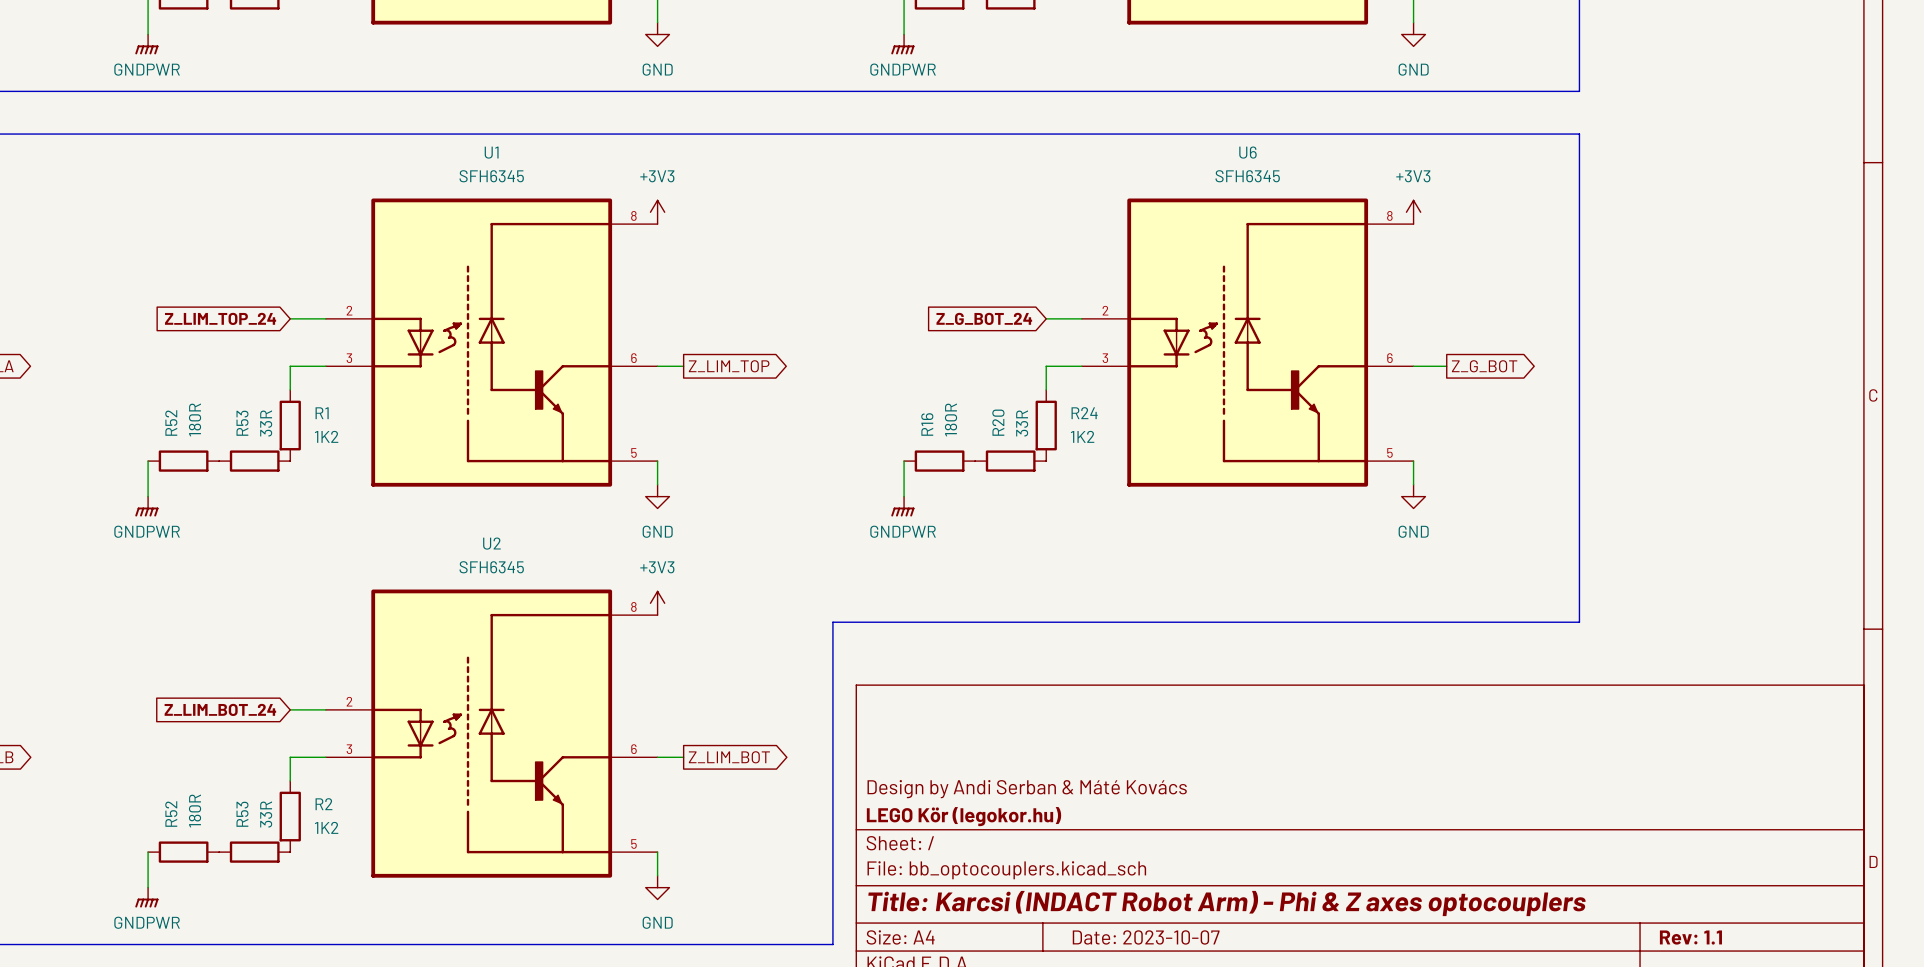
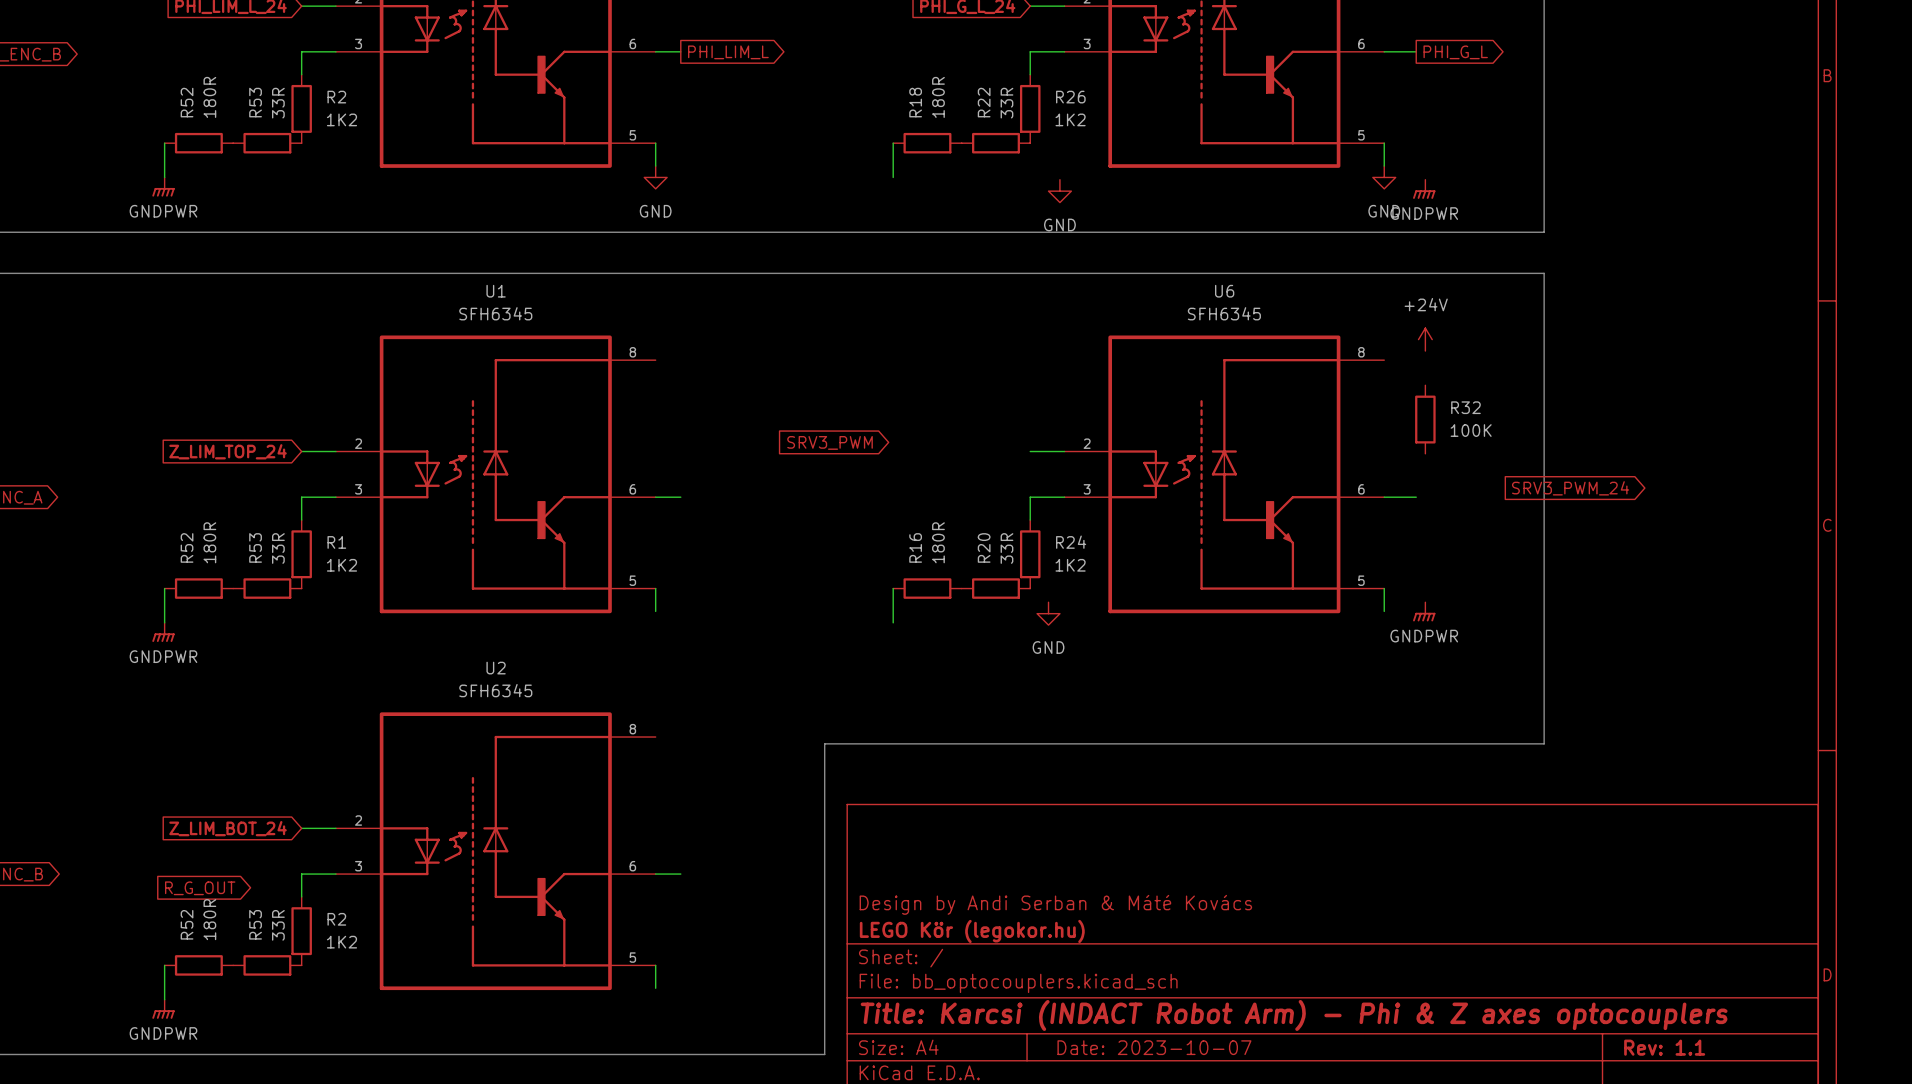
power symbol: GNDPWR (902, 44) -> none
power symbol: none -> GNDPWR (1424, 189)
power symbol: none -> GND (1059, 191)
power symbol: none -> +24V (1425, 339)
power symbol: +3V3 (657, 212) -> none
power symbol: +3V3 (1413, 212) -> none
R32: none -> 100K (1425, 419)
global label: none -> SRV3_PWM (830, 442)
global label: Z_G_BOT_24 (984, 318) -> none
global label: none -> SRV3_PWM_24 (1570, 488)
global label: Z_LIM_TOP (729, 366) -> none
global label: Z_G_BOT (1484, 366) -> none
power symbol: none -> GNDPWR (1424, 611)
power symbol: none -> GND (1048, 613)
power symbol: GND (657, 496) -> none
power symbol: GND (1413, 496) -> none
power symbol: GNDPWR (902, 506) -> none
power symbol: +3V3 (657, 603) -> none
global label: Z_LIM_BOT (729, 757) -> none
global label: none -> R_G_OUT (200, 888)
power symbol: GND (657, 887) -> none

